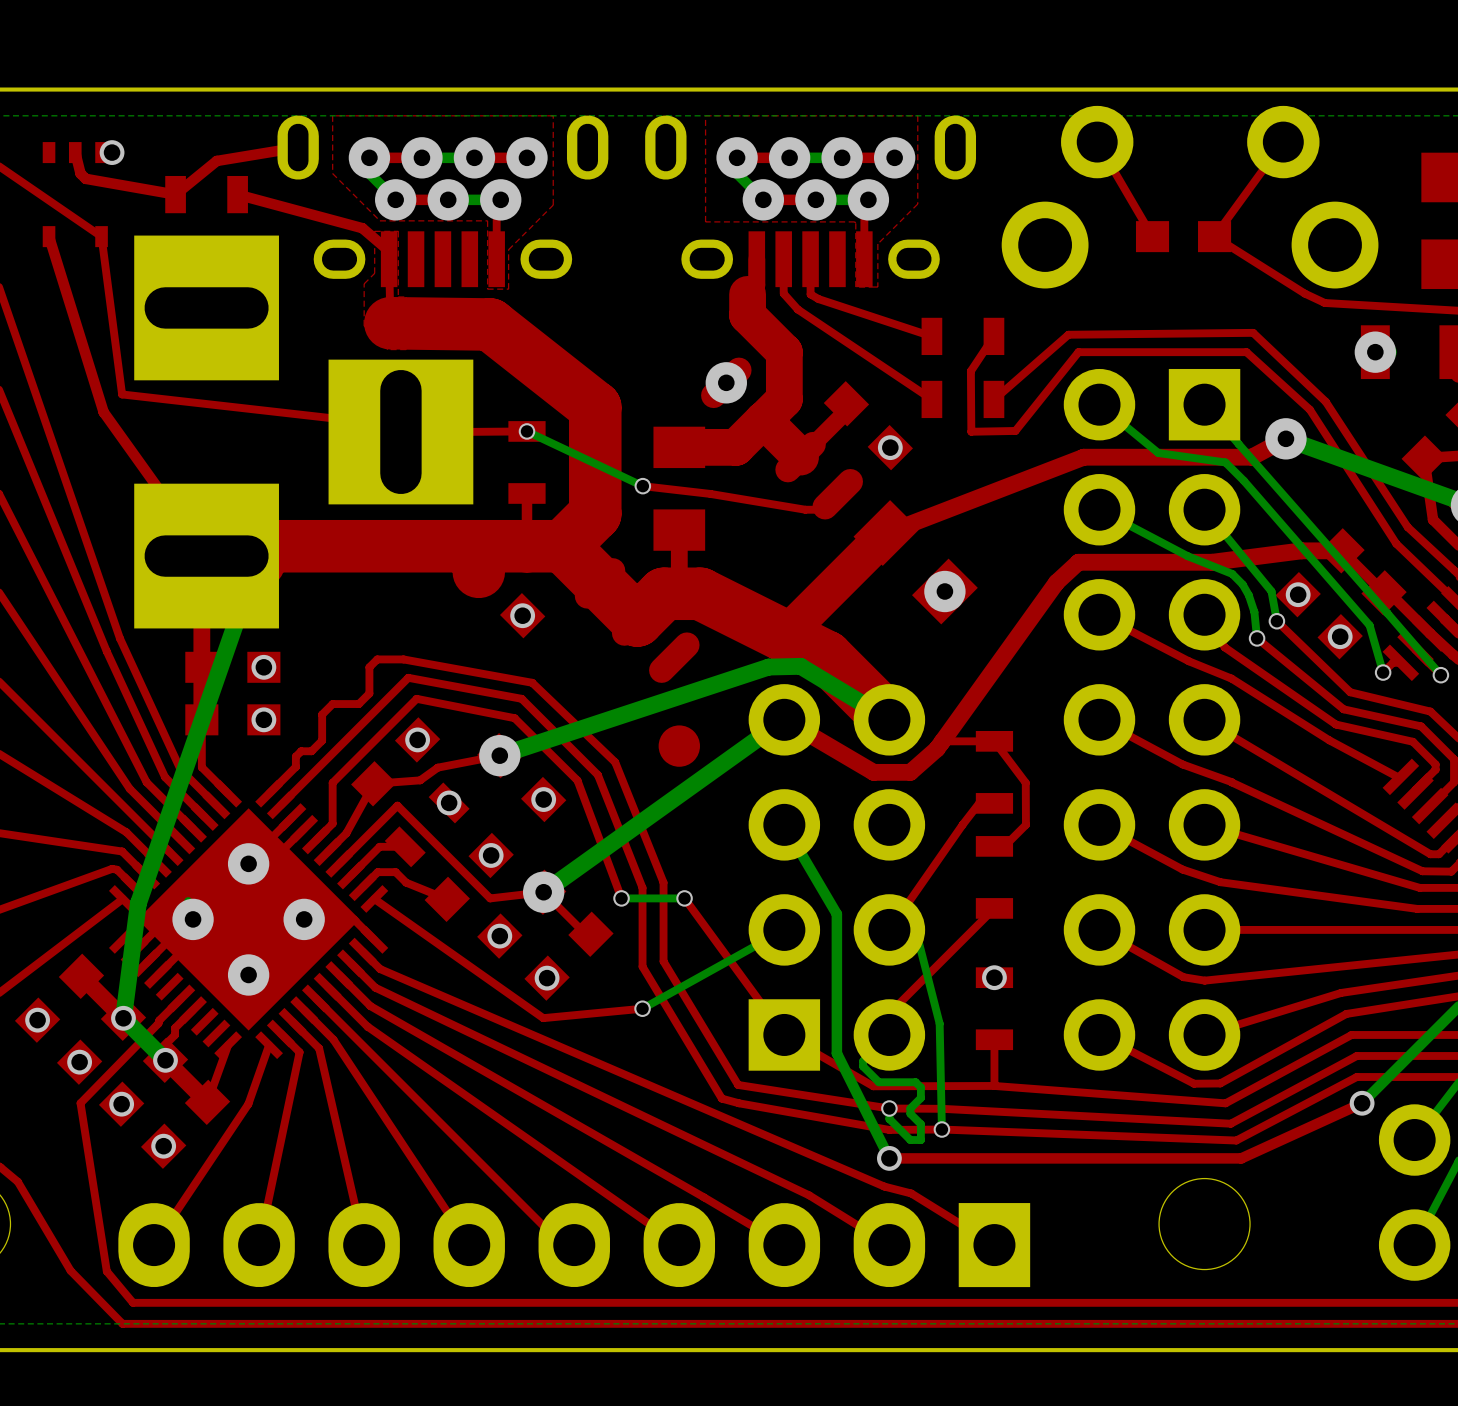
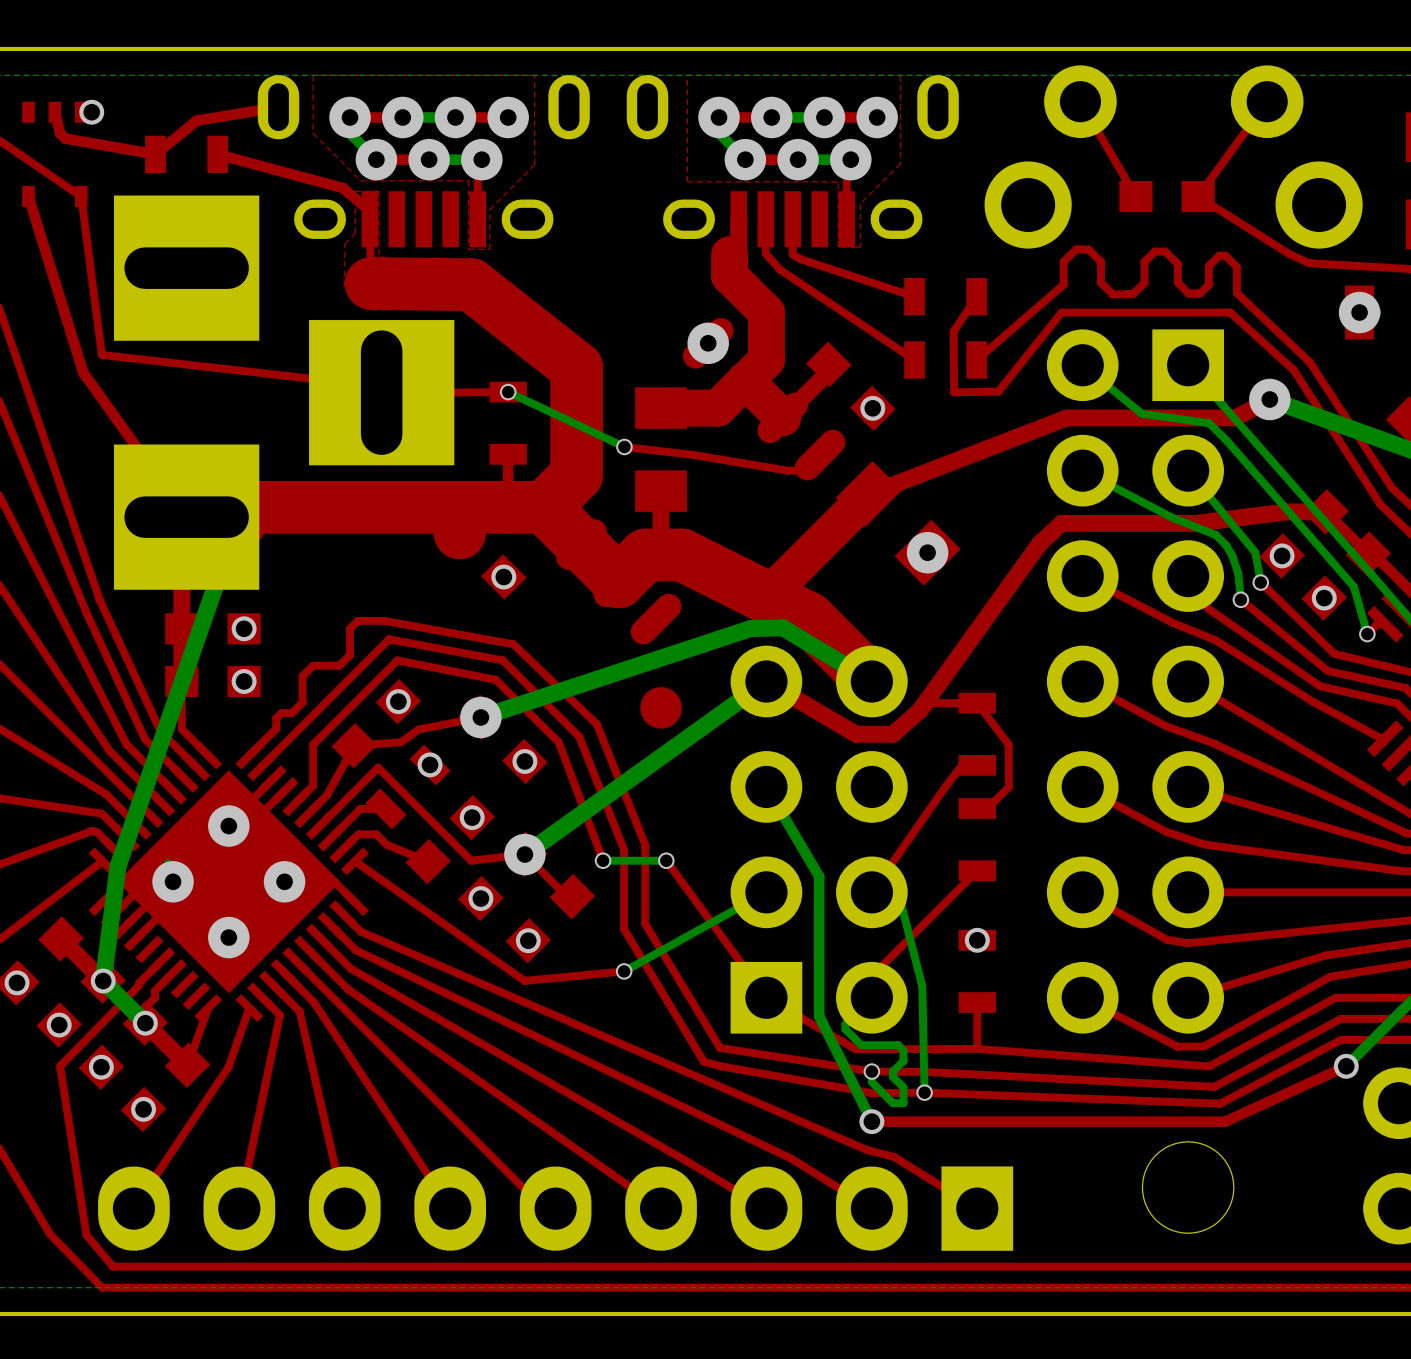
top track: (1253, 332) (1212, 333) -> (1236, 293) (1236, 267) (1225, 255) (1219, 255) (1208, 266) (1208, 284) (1200, 293) (1196, 293)
top track: (1205, 333) (1144, 333) -> (1188, 293) (1177, 282) (1177, 263) (1165, 251) (1154, 251) (1144, 261) (1144, 282) (1132, 294) (1127, 294)
top track: (1129, 334) (1068, 334) (994, 399) -> (1112, 294) (1100, 282) (1100, 261) (1088, 249) (1076, 249) (1063, 261) (1063, 284) (976, 359)

